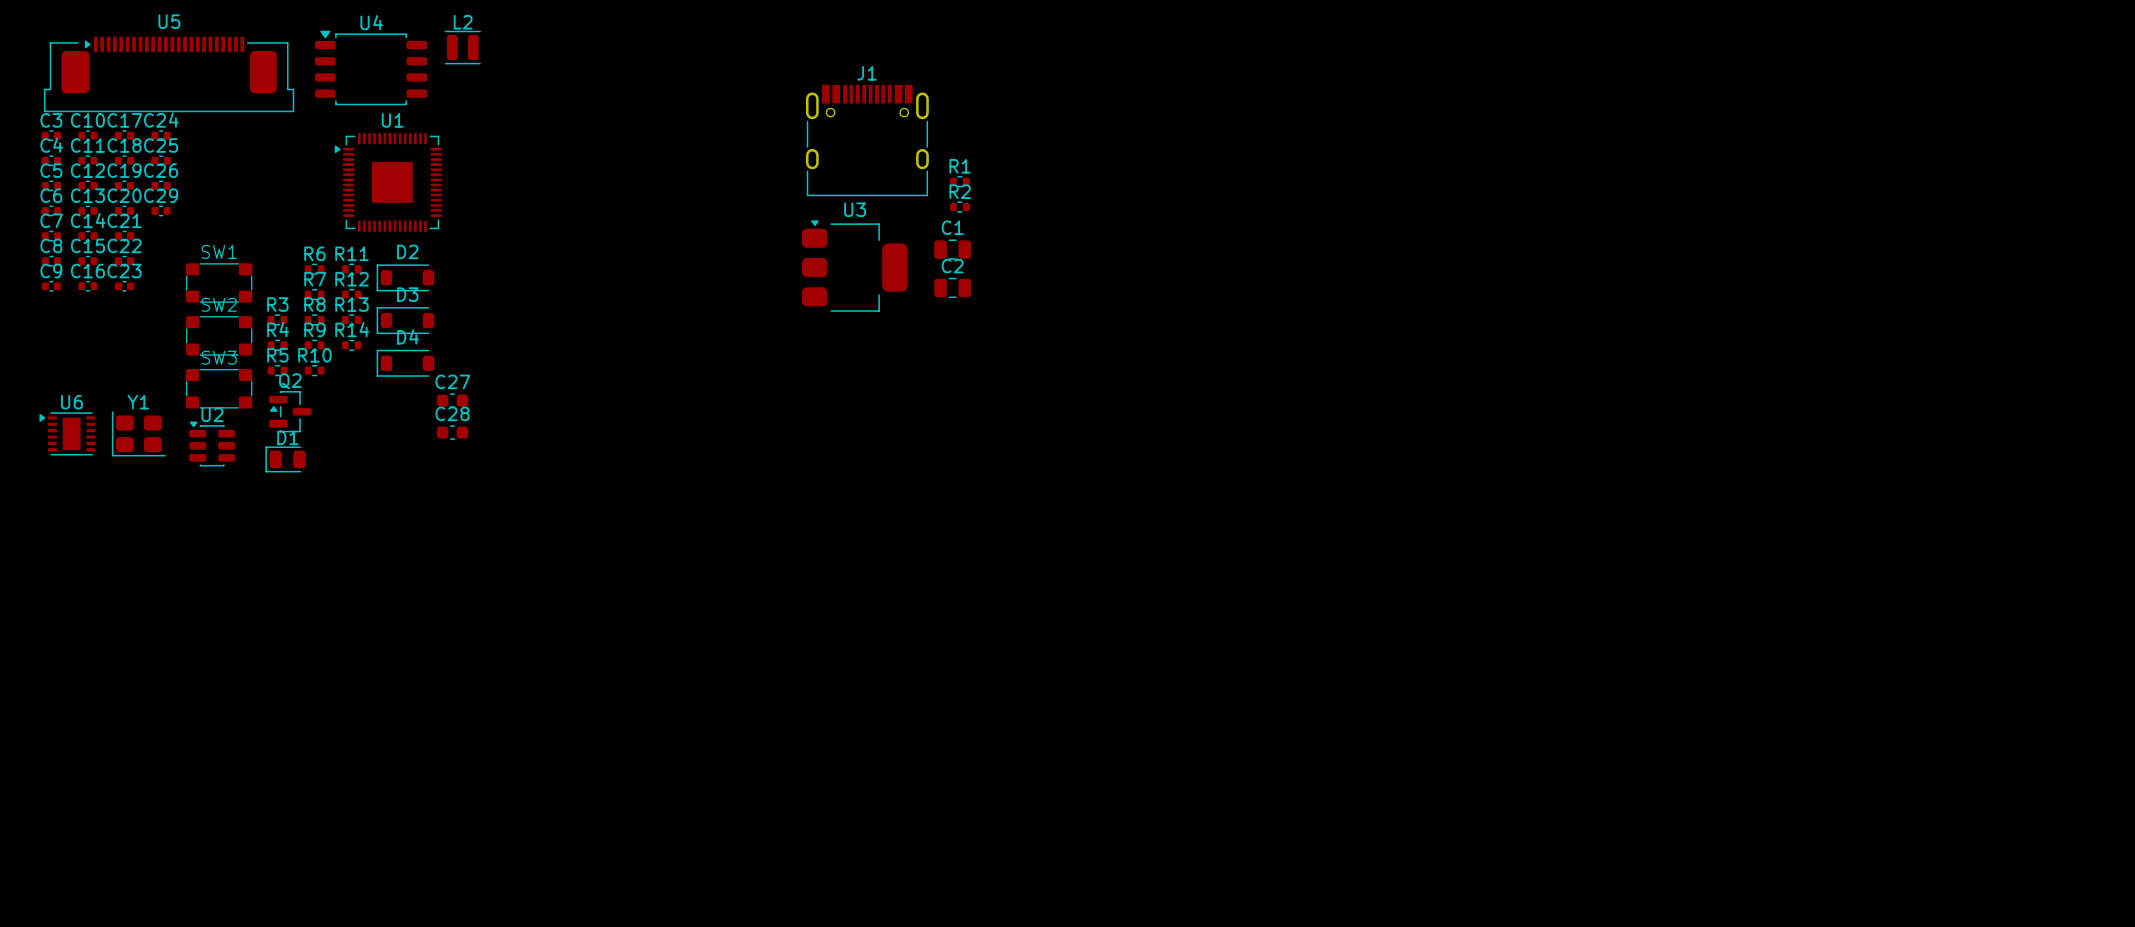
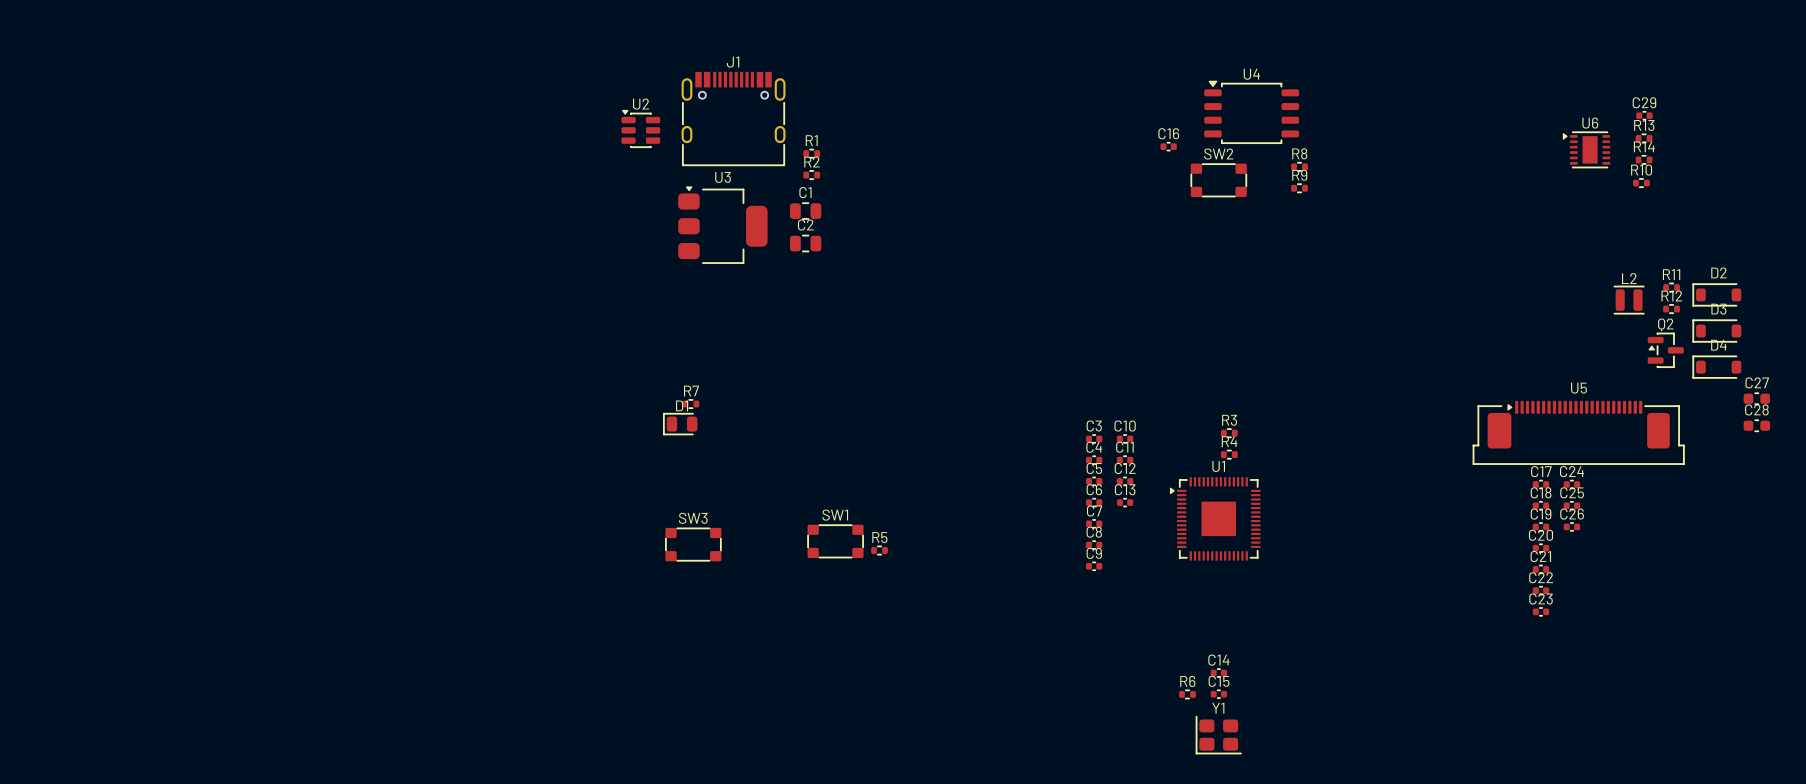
L2 position: (462, 47) -> (1629, 300)
U4 position: (371, 67) -> (1251, 112)
U5 position: (169, 74) -> (1578, 432)
C3 position: (51, 135) -> (1094, 438)
C10 position: (87, 135) -> (1125, 438)
C17 position: (124, 135) -> (1540, 484)
C24 position: (161, 135) -> (1571, 484)
C4 position: (51, 160) -> (1094, 460)
C11 position: (87, 160) -> (1125, 460)
C18 position: (124, 160) -> (1540, 505)
C25 position: (161, 160) -> (1571, 505)
U1 position: (388, 182) -> (1215, 518)
C5 position: (51, 185) -> (1094, 481)
C12 position: (87, 185) -> (1125, 481)
C19 position: (124, 185) -> (1540, 526)
C26 position: (161, 185) -> (1571, 526)
C6 position: (51, 210) -> (1094, 502)
C13 position: (87, 210) -> (1125, 502)
C20 position: (124, 210) -> (1540, 548)
C29 position: (161, 210) -> (1644, 115)
C7 position: (51, 236) -> (1094, 523)
C14 position: (87, 236) -> (1218, 672)
C21 position: (124, 236) -> (1540, 569)
C8 position: (51, 261) -> (1094, 545)
C15 position: (87, 261) -> (1218, 694)
C22 position: (124, 261) -> (1540, 590)
R6 position: (314, 269) -> (1187, 694)
R11 position: (351, 269) -> (1671, 287)
D2 position: (405, 277) -> (1716, 294)
SW1 position: (219, 282) -> (835, 541)
C9 position: (51, 286) -> (1094, 566)
C16 position: (87, 286) -> (1168, 146)
C23 position: (124, 286) -> (1540, 611)
R7 position: (314, 294) -> (690, 404)
R12 position: (351, 294) -> (1671, 309)
R3 position: (277, 319) -> (1229, 433)
R8 position: (314, 319) -> (1299, 166)
R13 position: (351, 319) -> (1644, 138)
D3 position: (405, 320) -> (1716, 331)
SW2 position: (219, 335) -> (1218, 180)
R4 position: (277, 345) -> (1229, 454)
R9 position: (314, 345) -> (1299, 188)
R14 position: (351, 345) -> (1644, 159)
D4 position: (405, 363) -> (1716, 367)
R5 position: (277, 370) -> (879, 550)
R10 position: (314, 370) -> (1641, 183)
SW3 position: (219, 388) -> (693, 544)
C27 position: (452, 400) -> (1756, 398)
Q2 position: (290, 411) -> (1665, 350)
C28 position: (452, 432) -> (1756, 425)
U6 position: (67, 433) -> (1586, 149)
Y1 position: (138, 433) -> (1218, 735)
U2 position: (212, 444) -> (640, 128)
D1 position: (285, 459) -> (680, 424)

